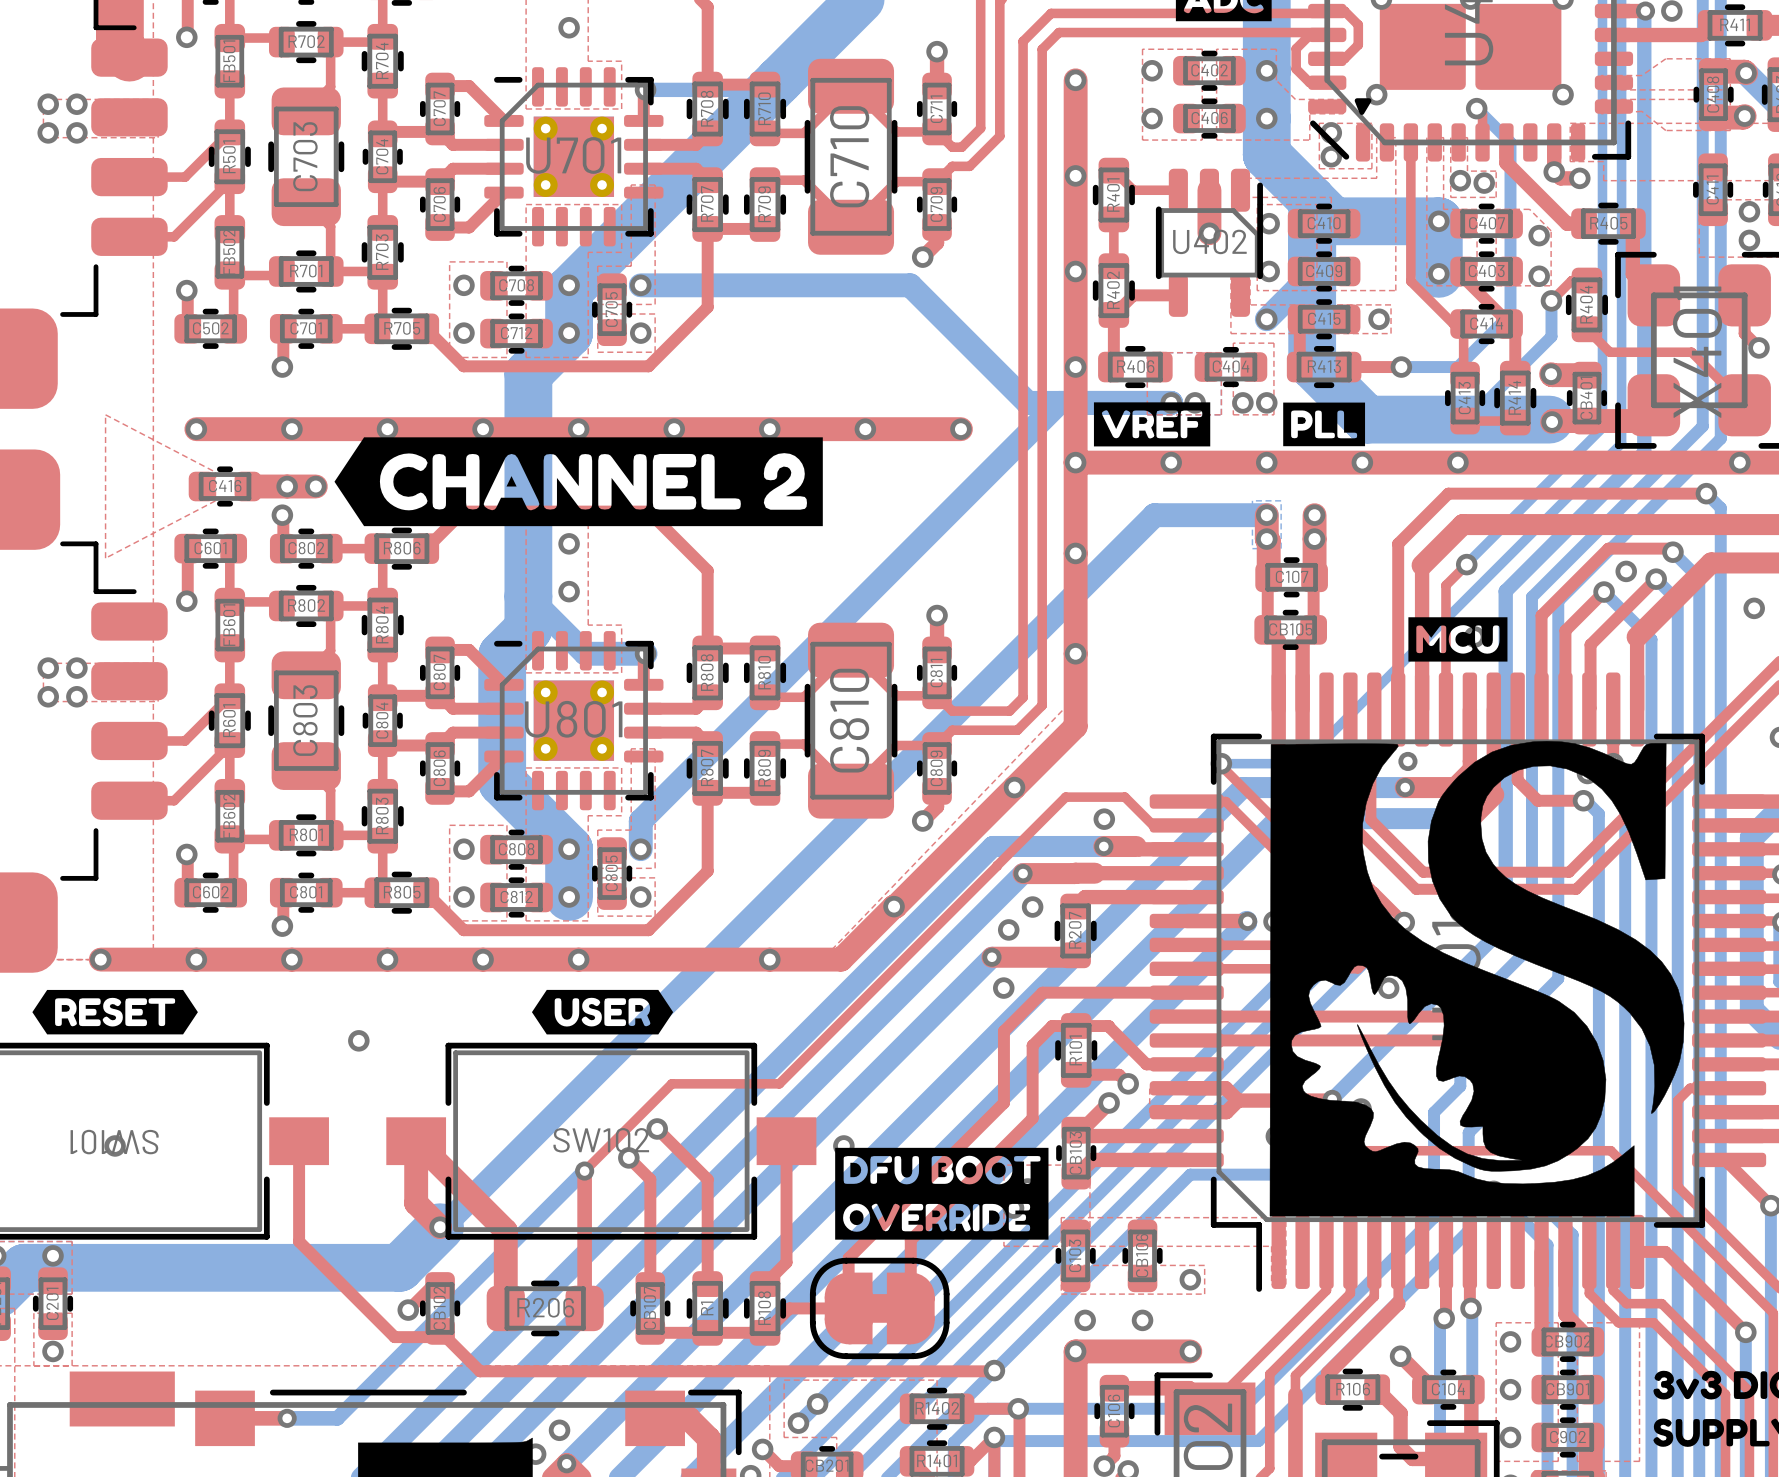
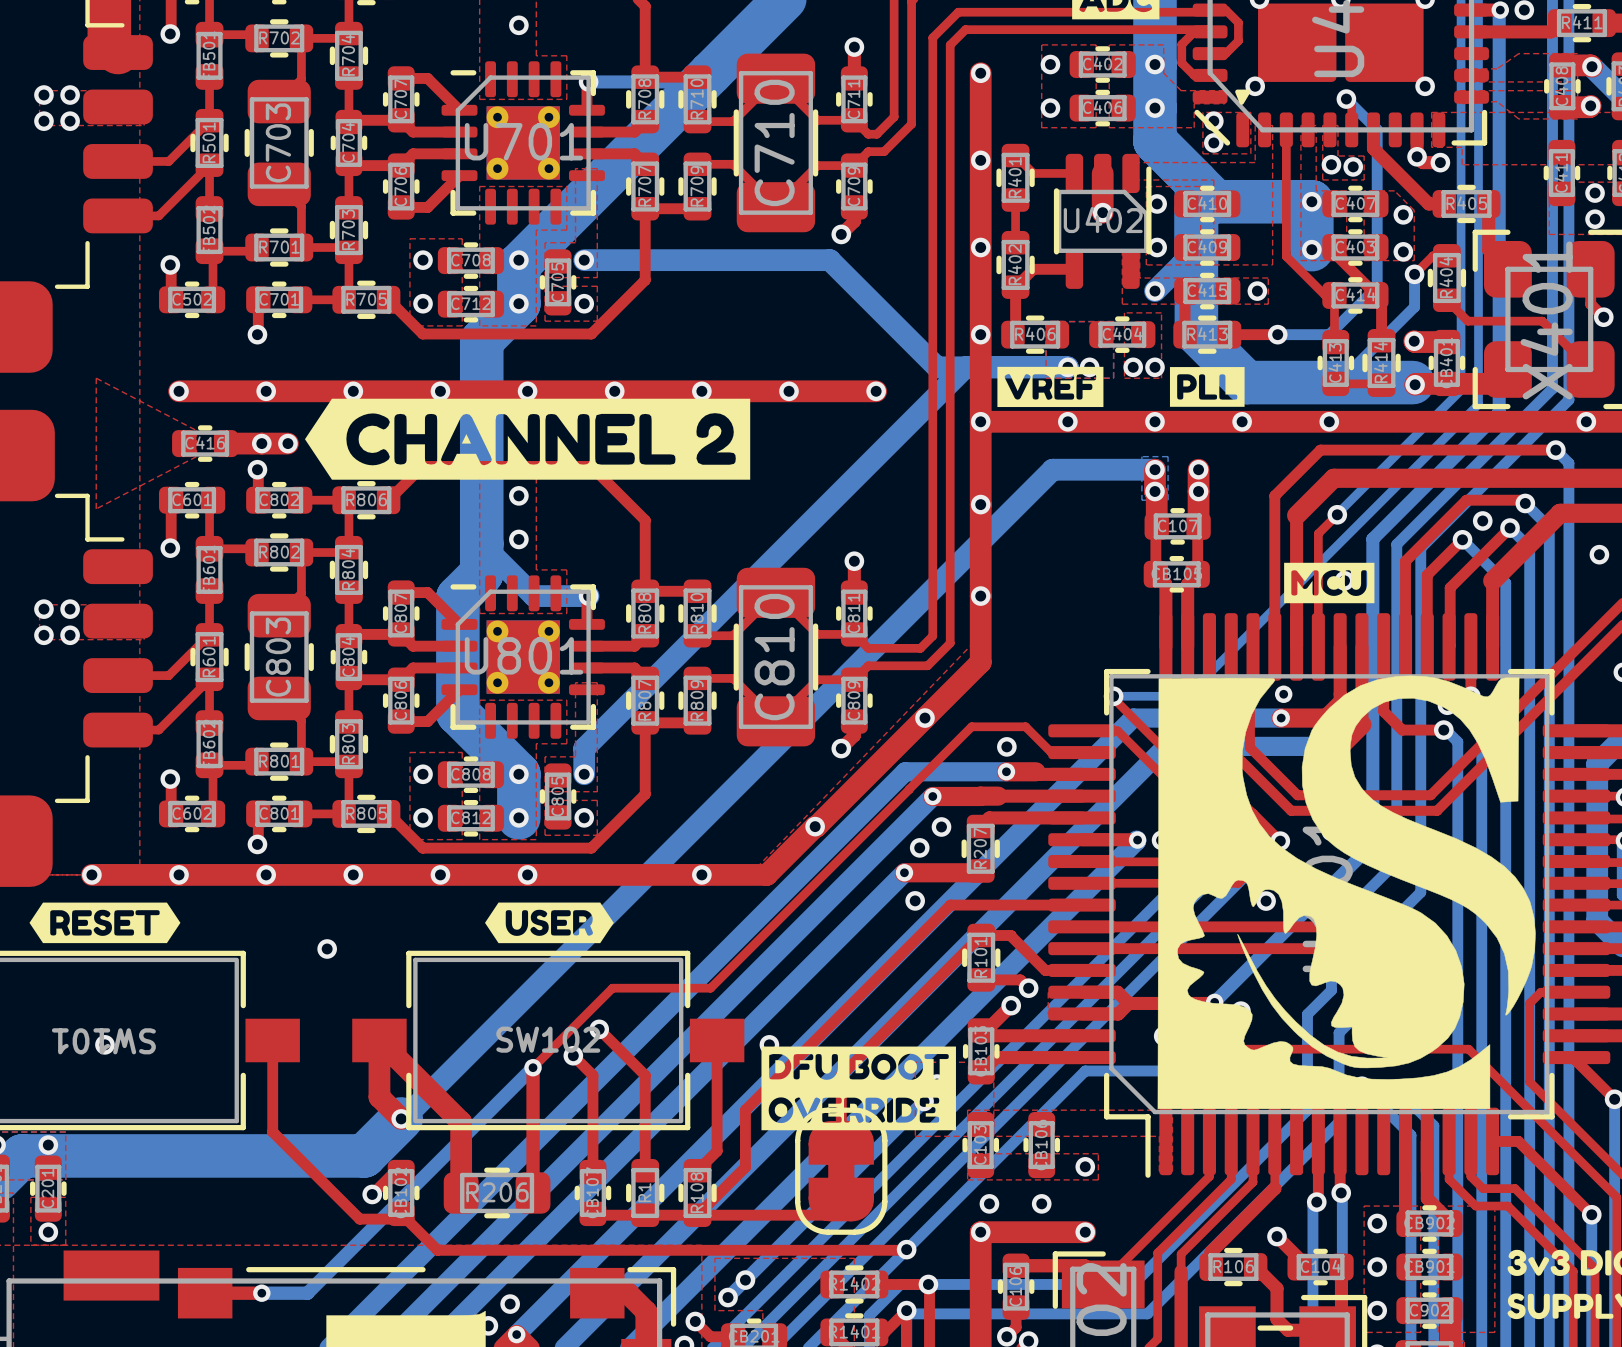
top track: (1076, 1026) (1052, 1026) (1032, 1045) (1032, 1118) (910, 1240) (910, 1308) -> (981, 935) (841, 1075) (841, 1142)
top track: (1003, 1031) (1003, 1102) (848, 1258) (848, 1308) (789, 1308) -> (915, 940) (745, 1110) (745, 1167) (719, 1192)
part rotation: 0° (879, 1308) -> 90° clockwise (841, 1171)
top track: none -> (841, 1199) (825, 1215) (697, 1215)

